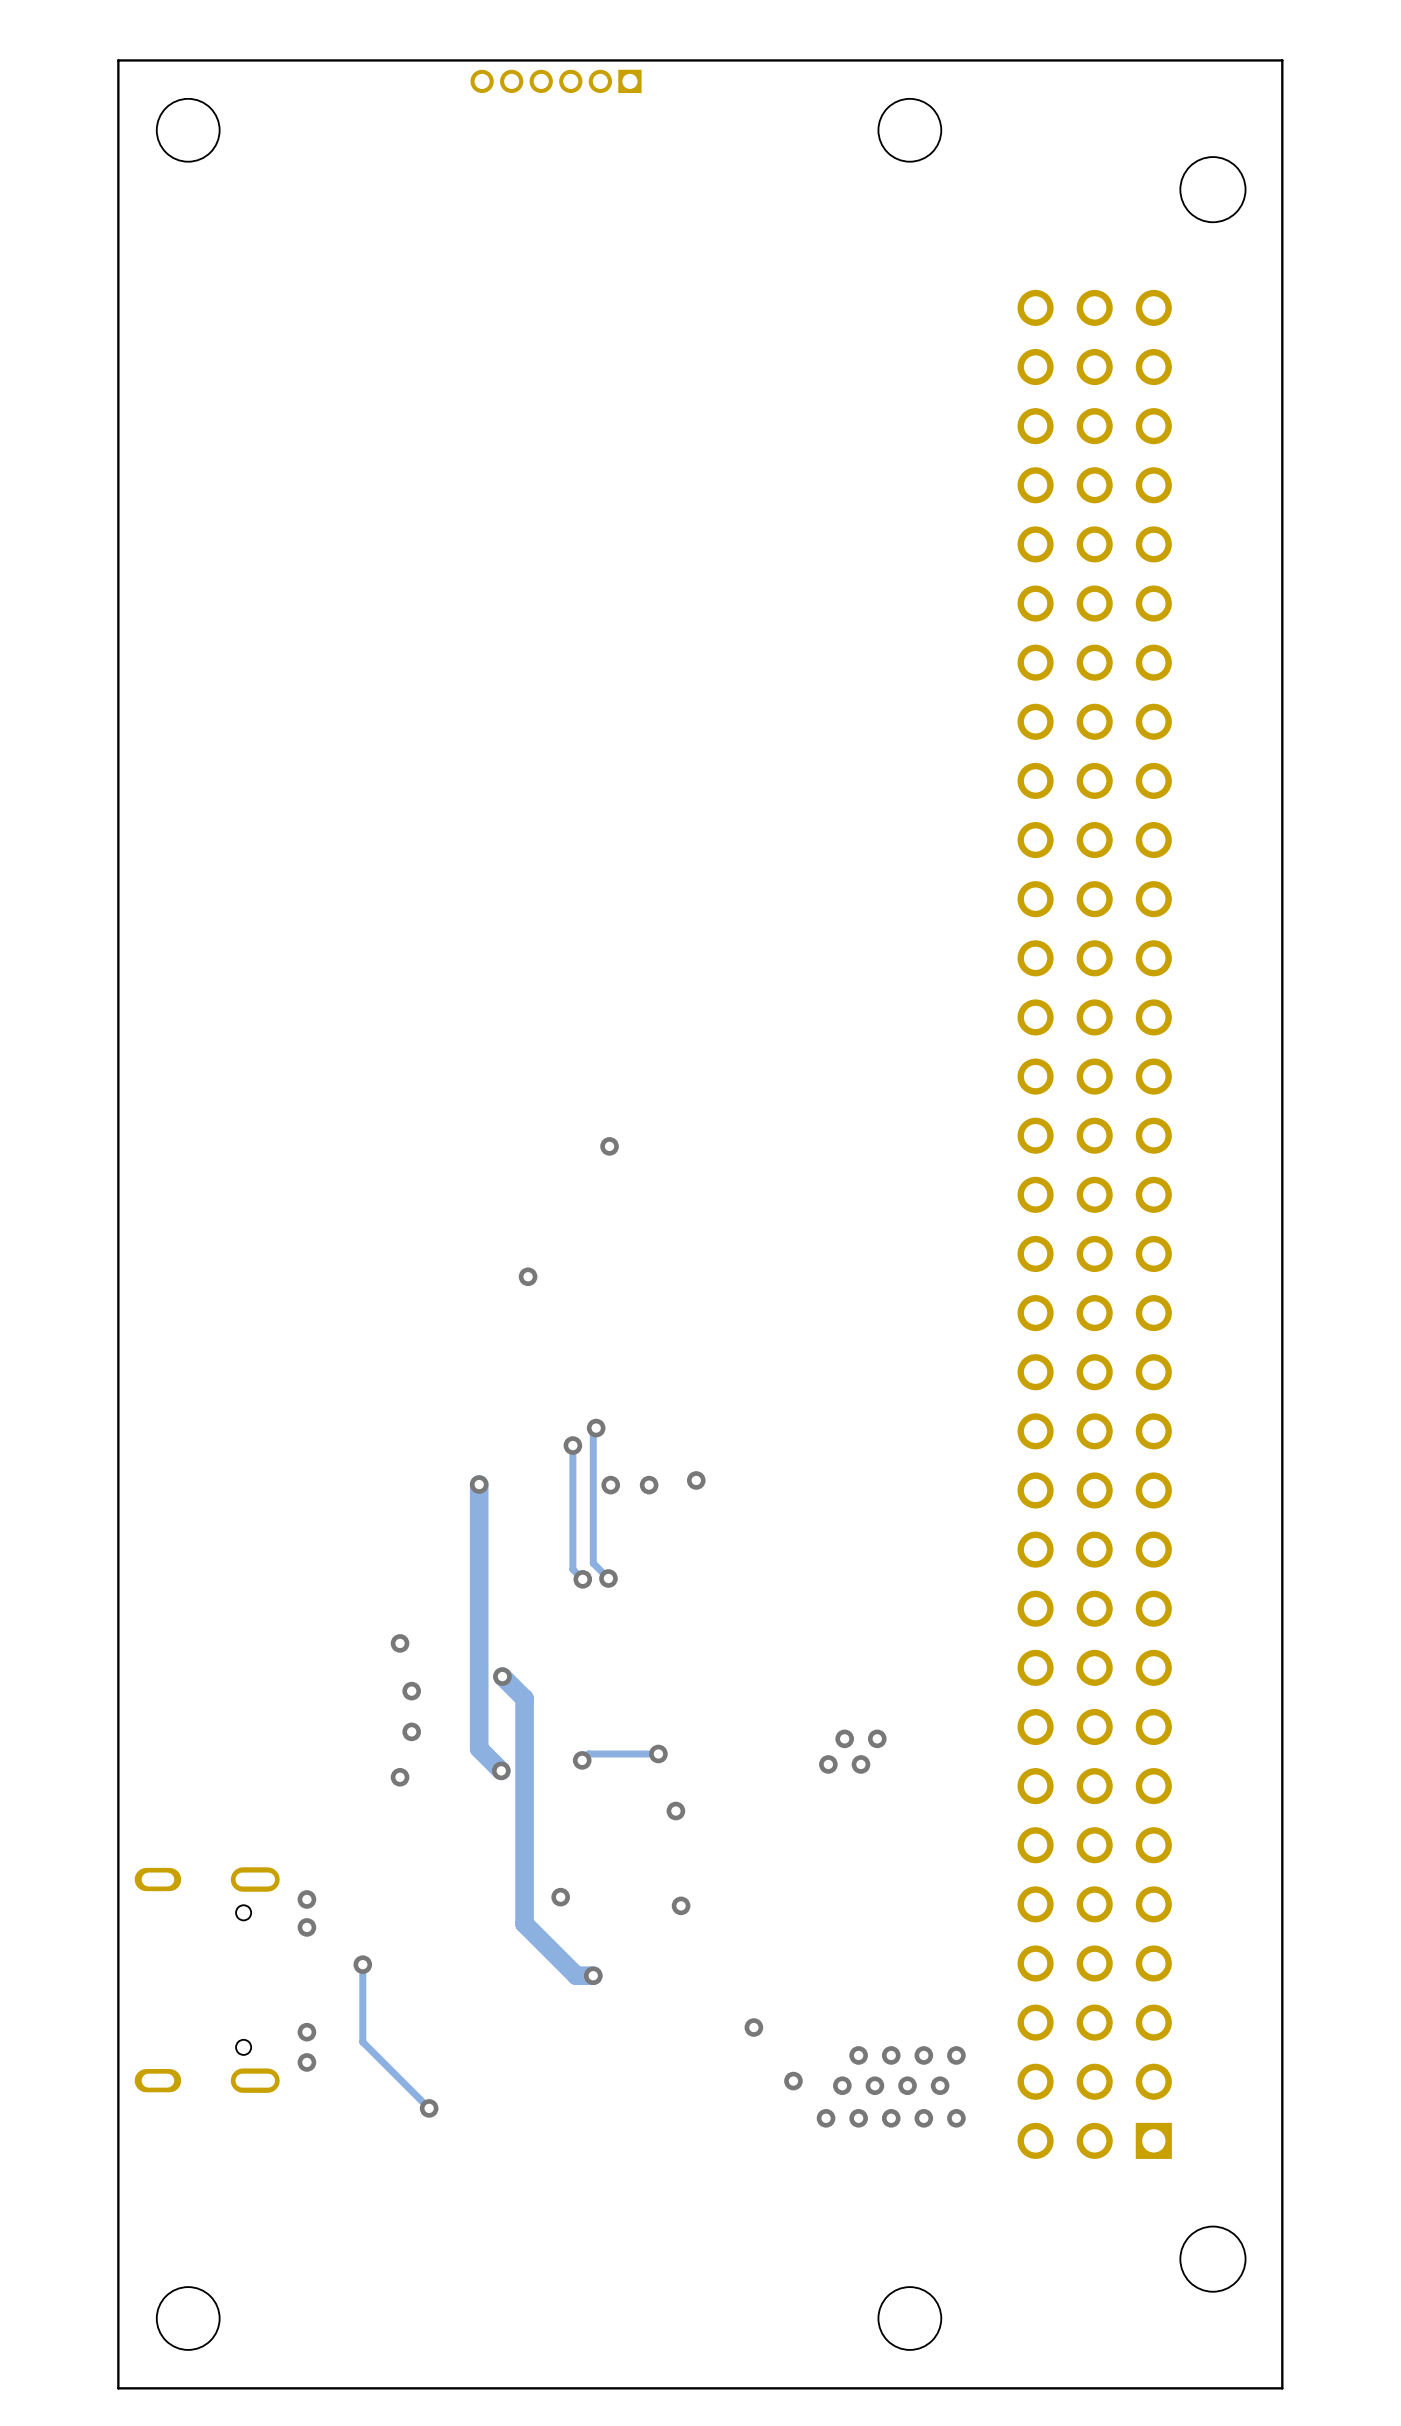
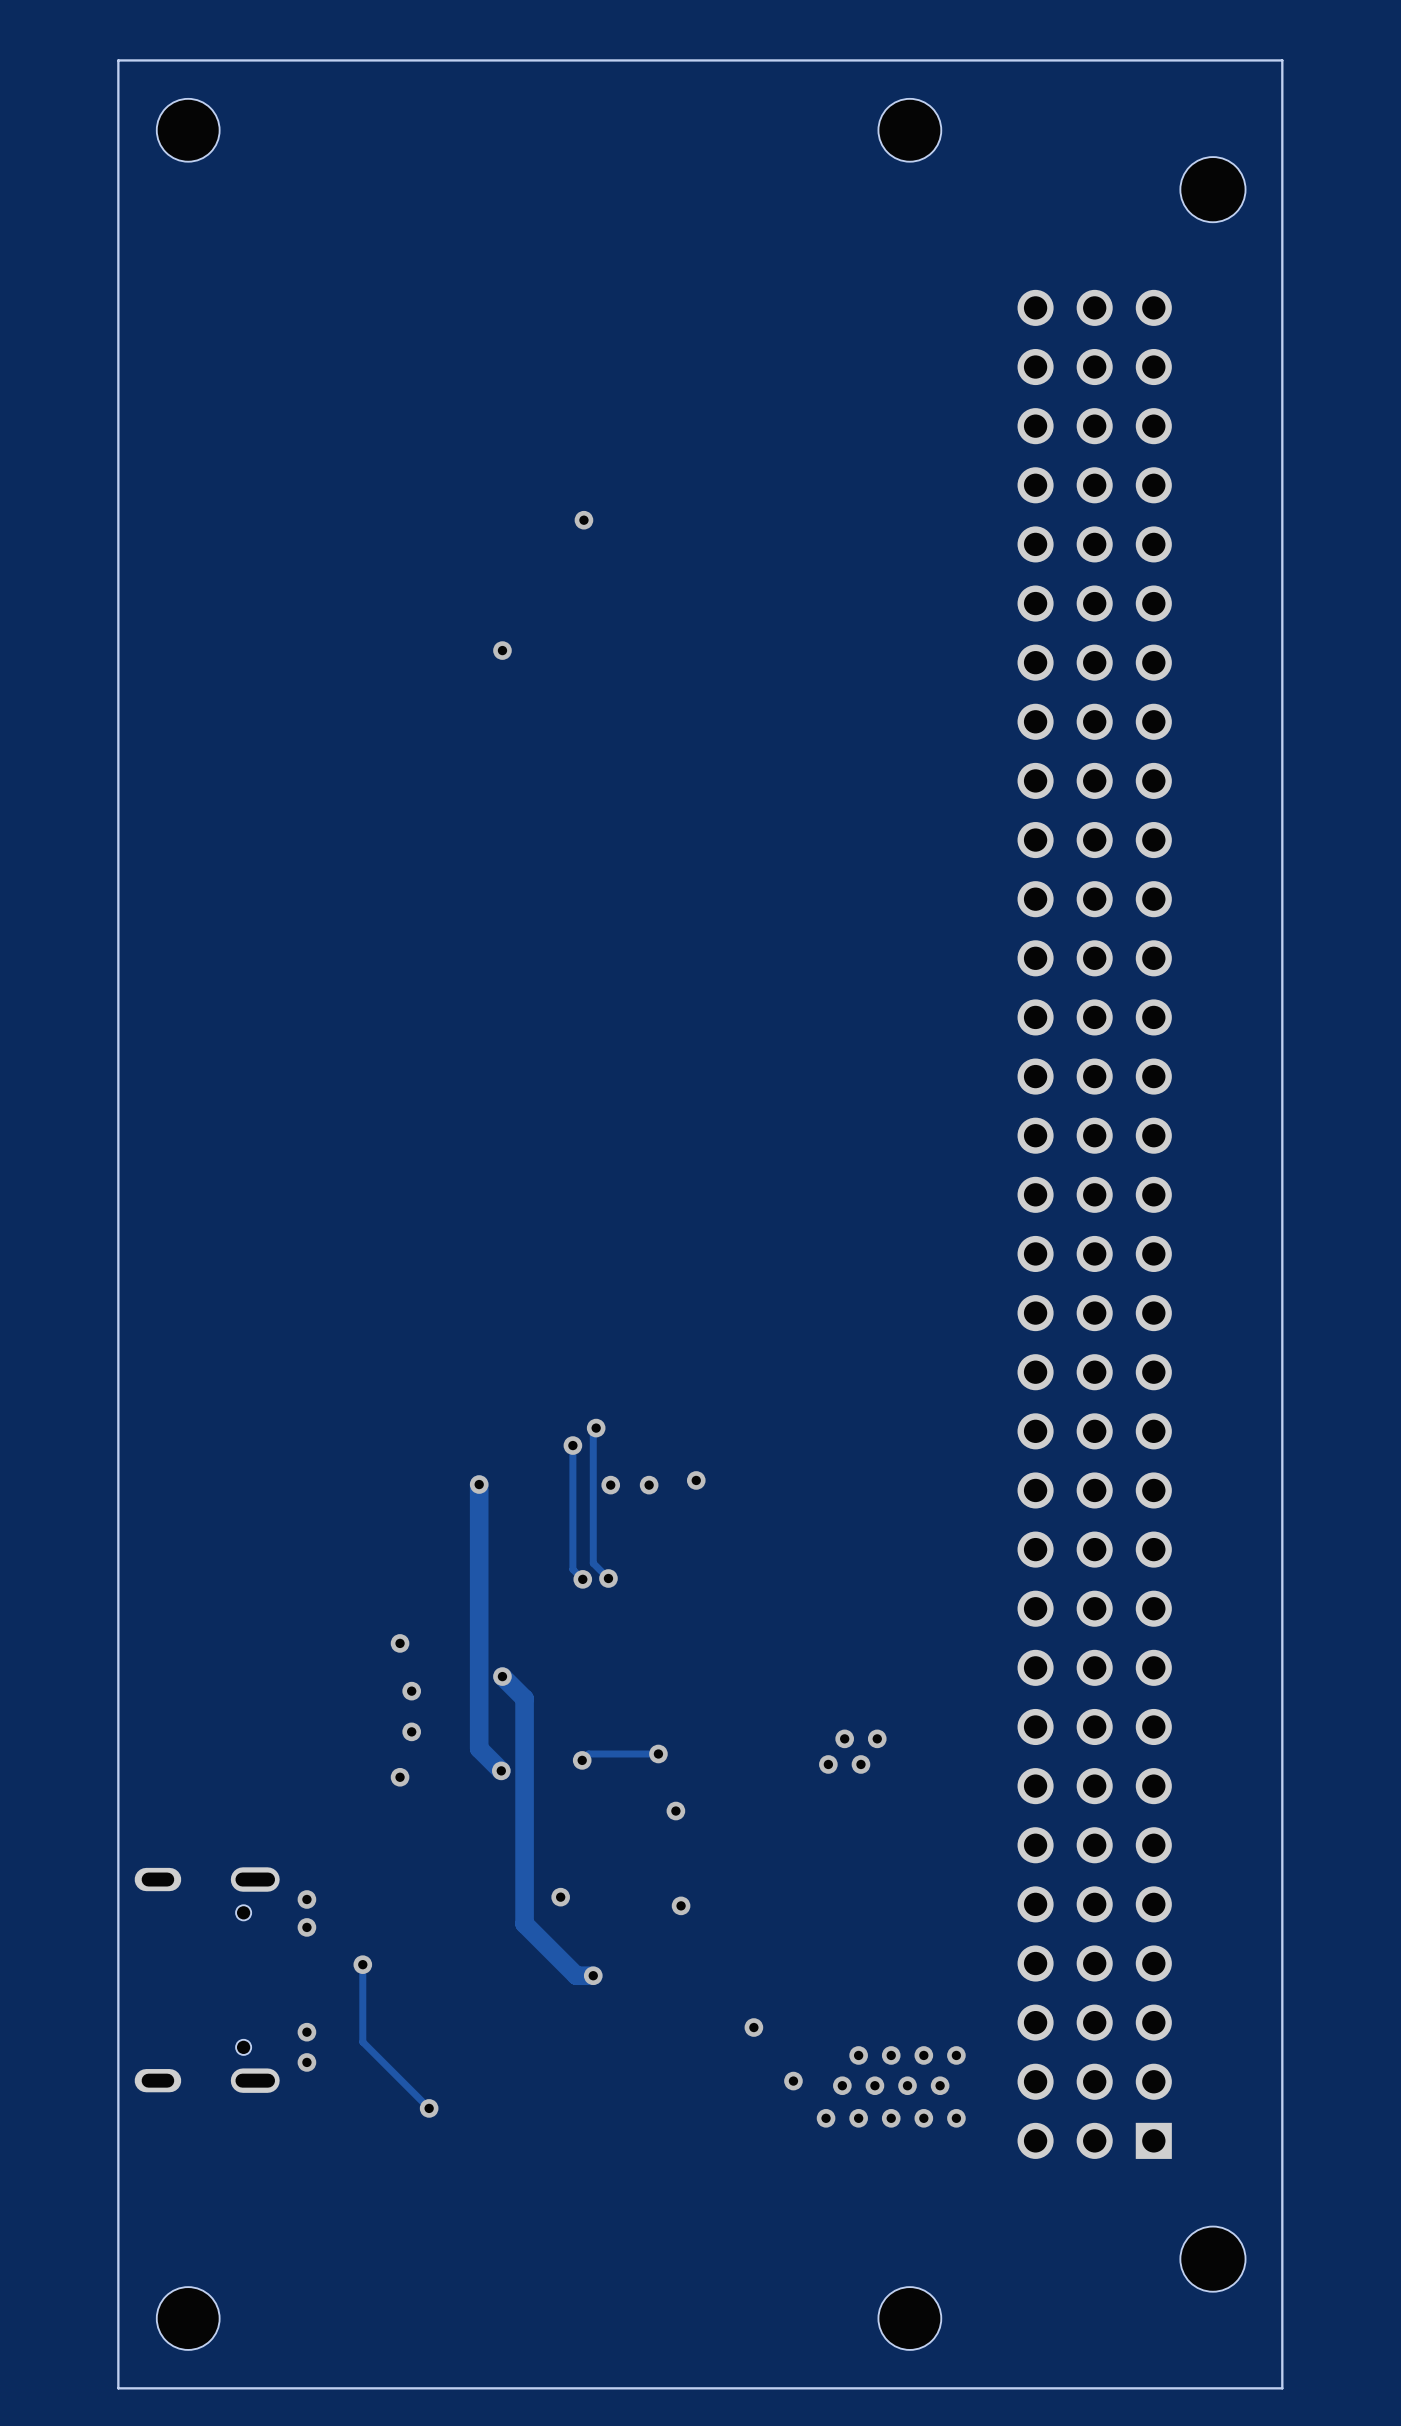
part: (556, 81) -> none
via: none -> (583, 520)
via: none -> (502, 650)
via: (609, 1146) -> none
via: (528, 1276) -> none

